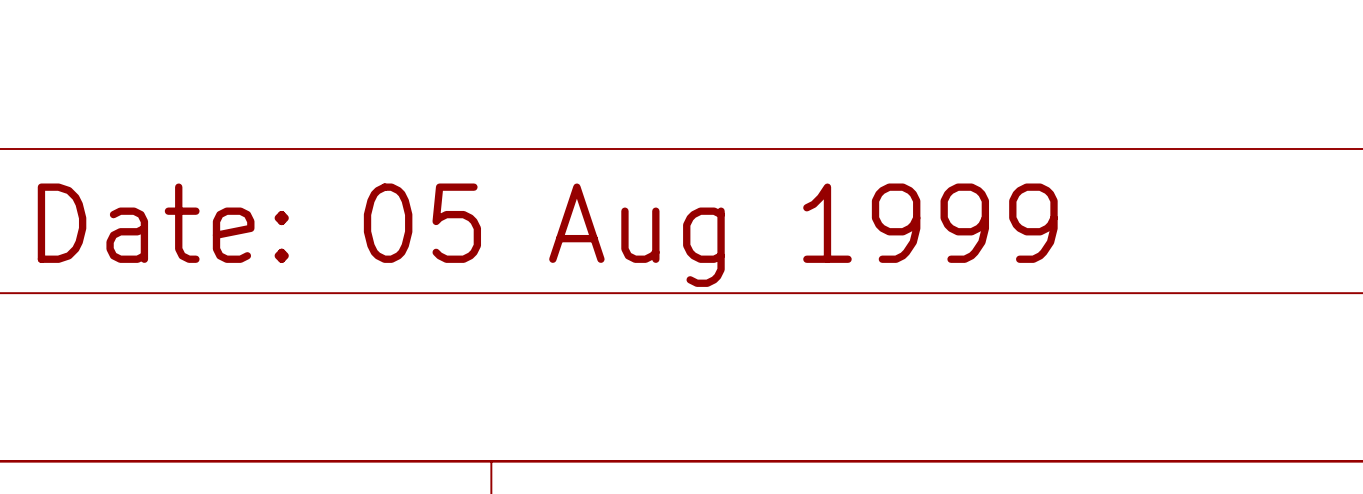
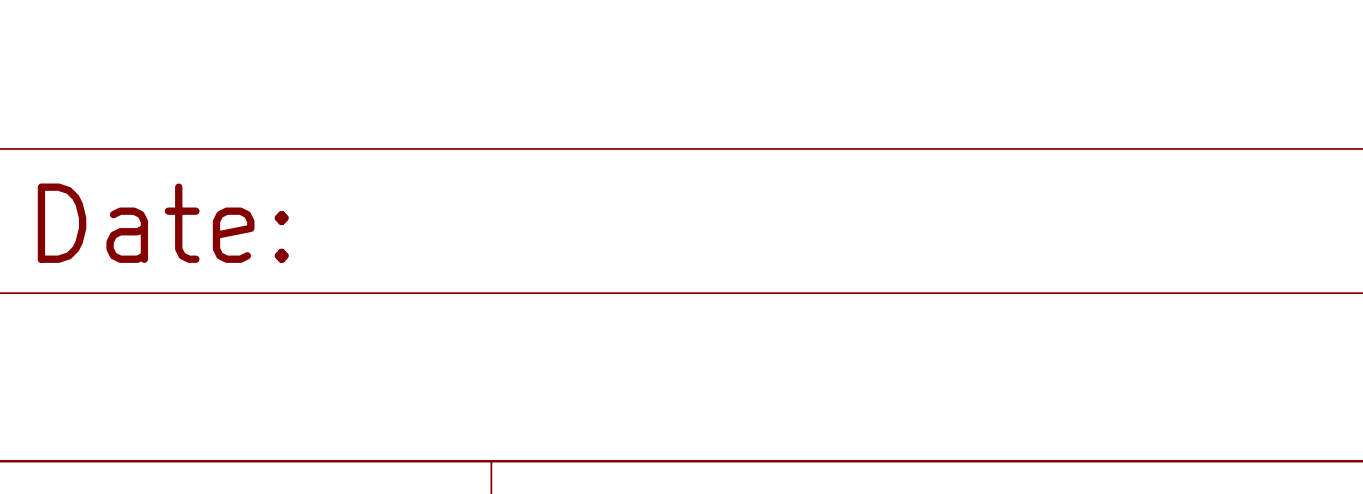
title block: Date: 05 Aug 1999 (547, 235) -> Date: (163, 223)

